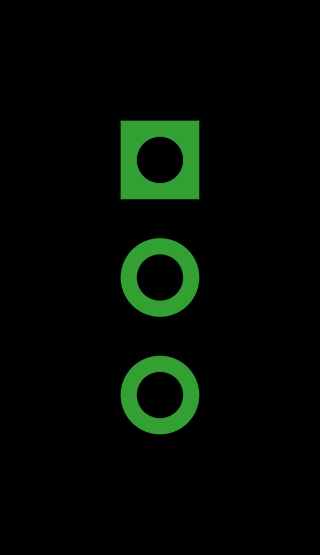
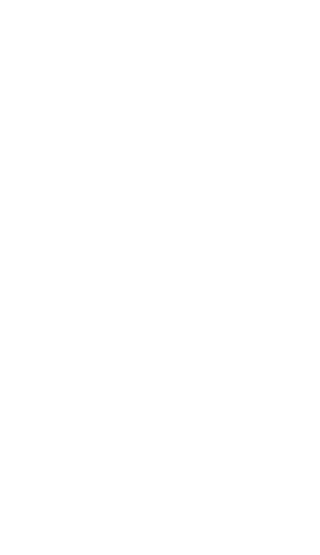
part: (159, 277) -> none

